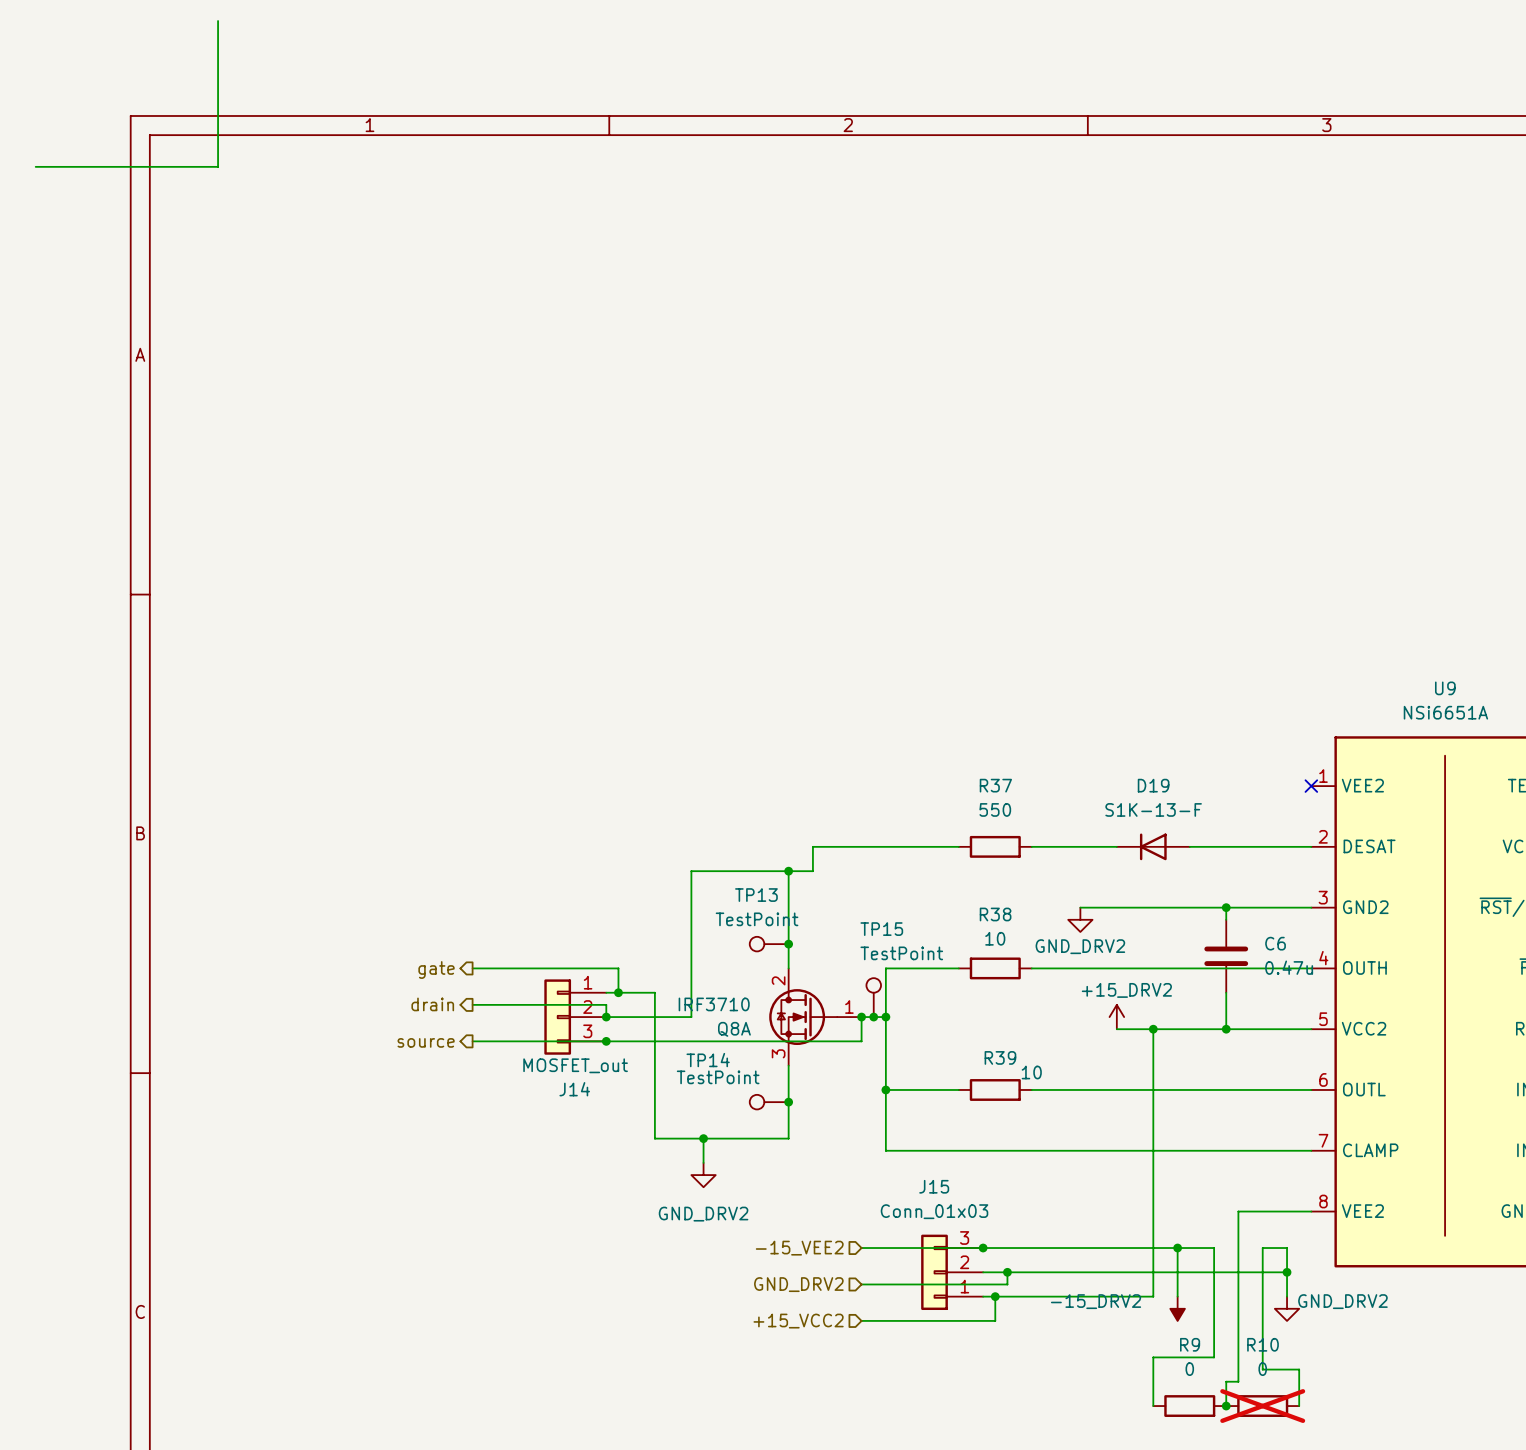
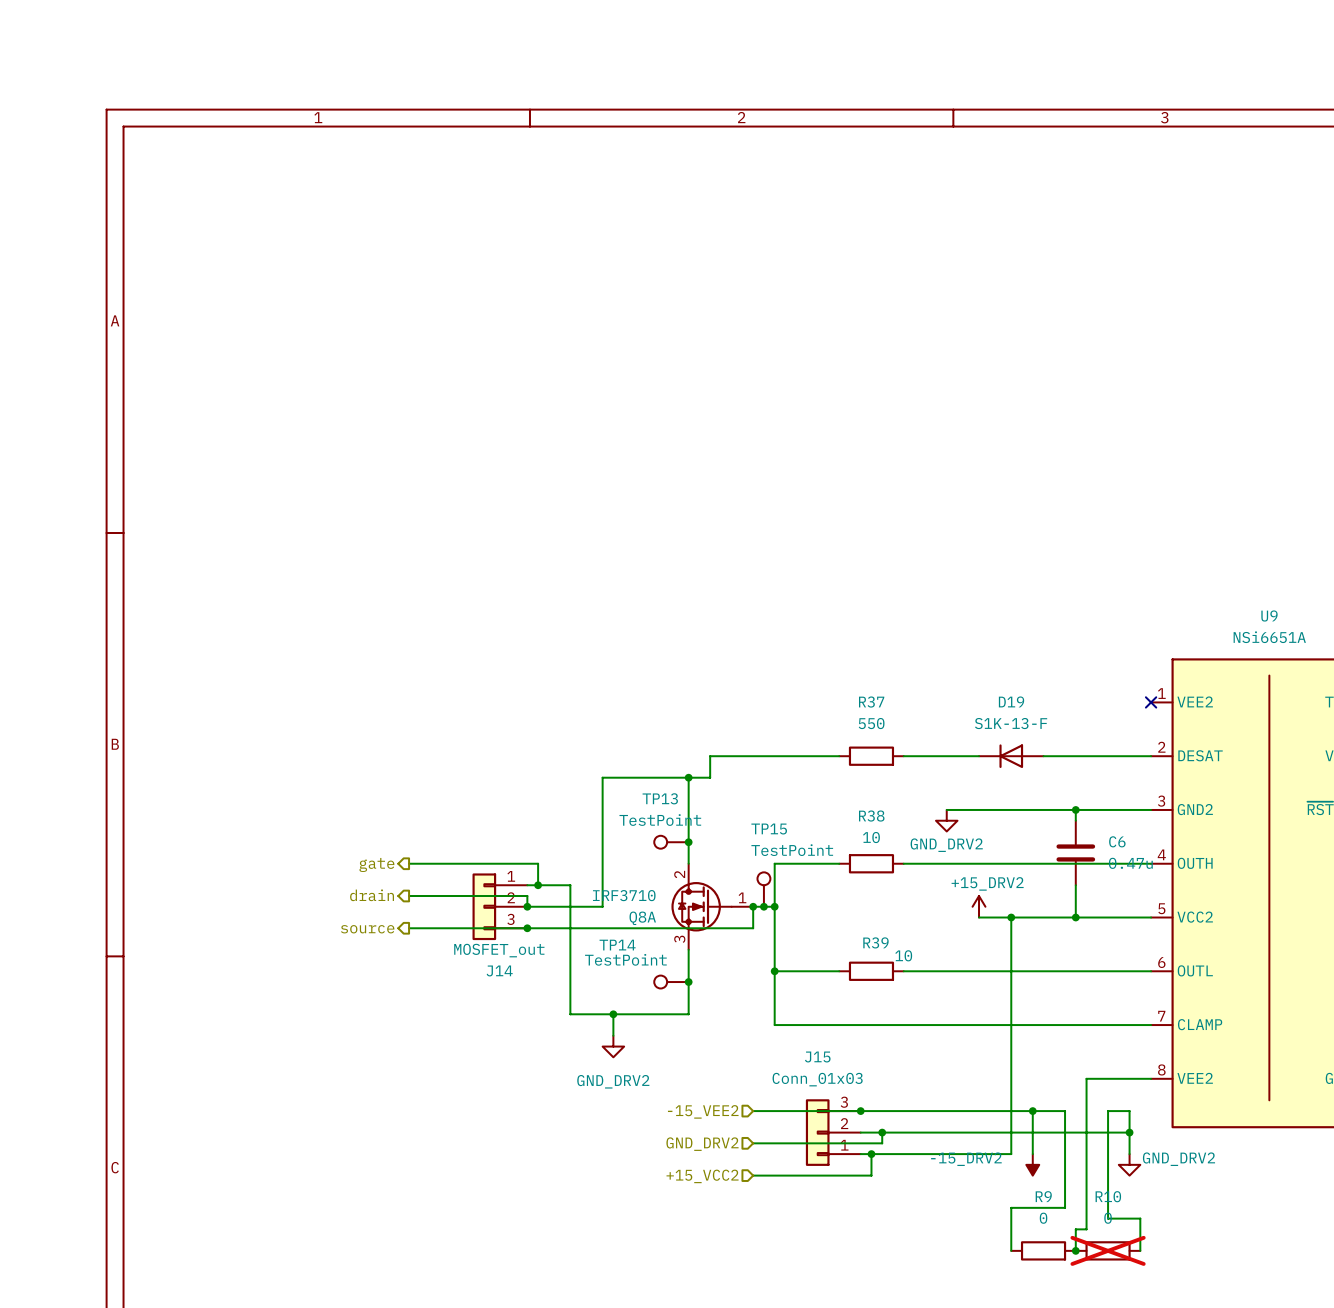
wire: (218, 21) (218, 166) (35, 166) -> none

